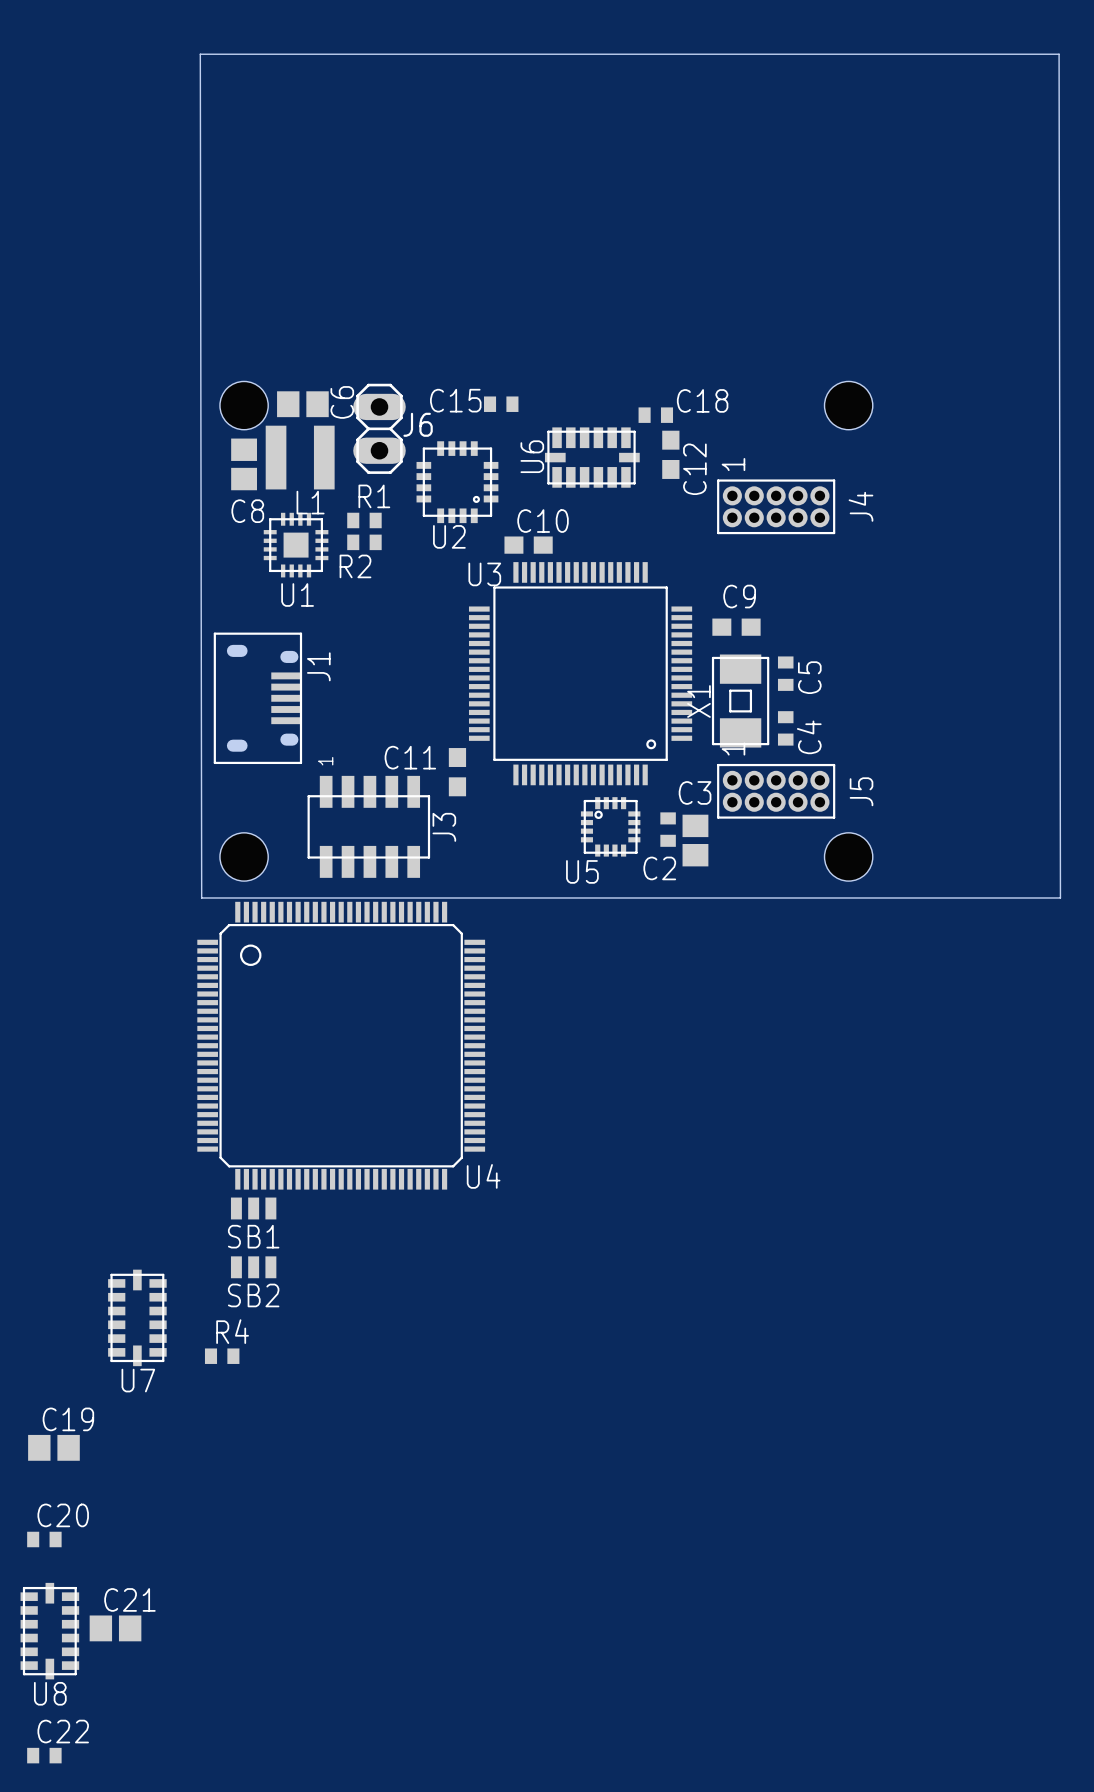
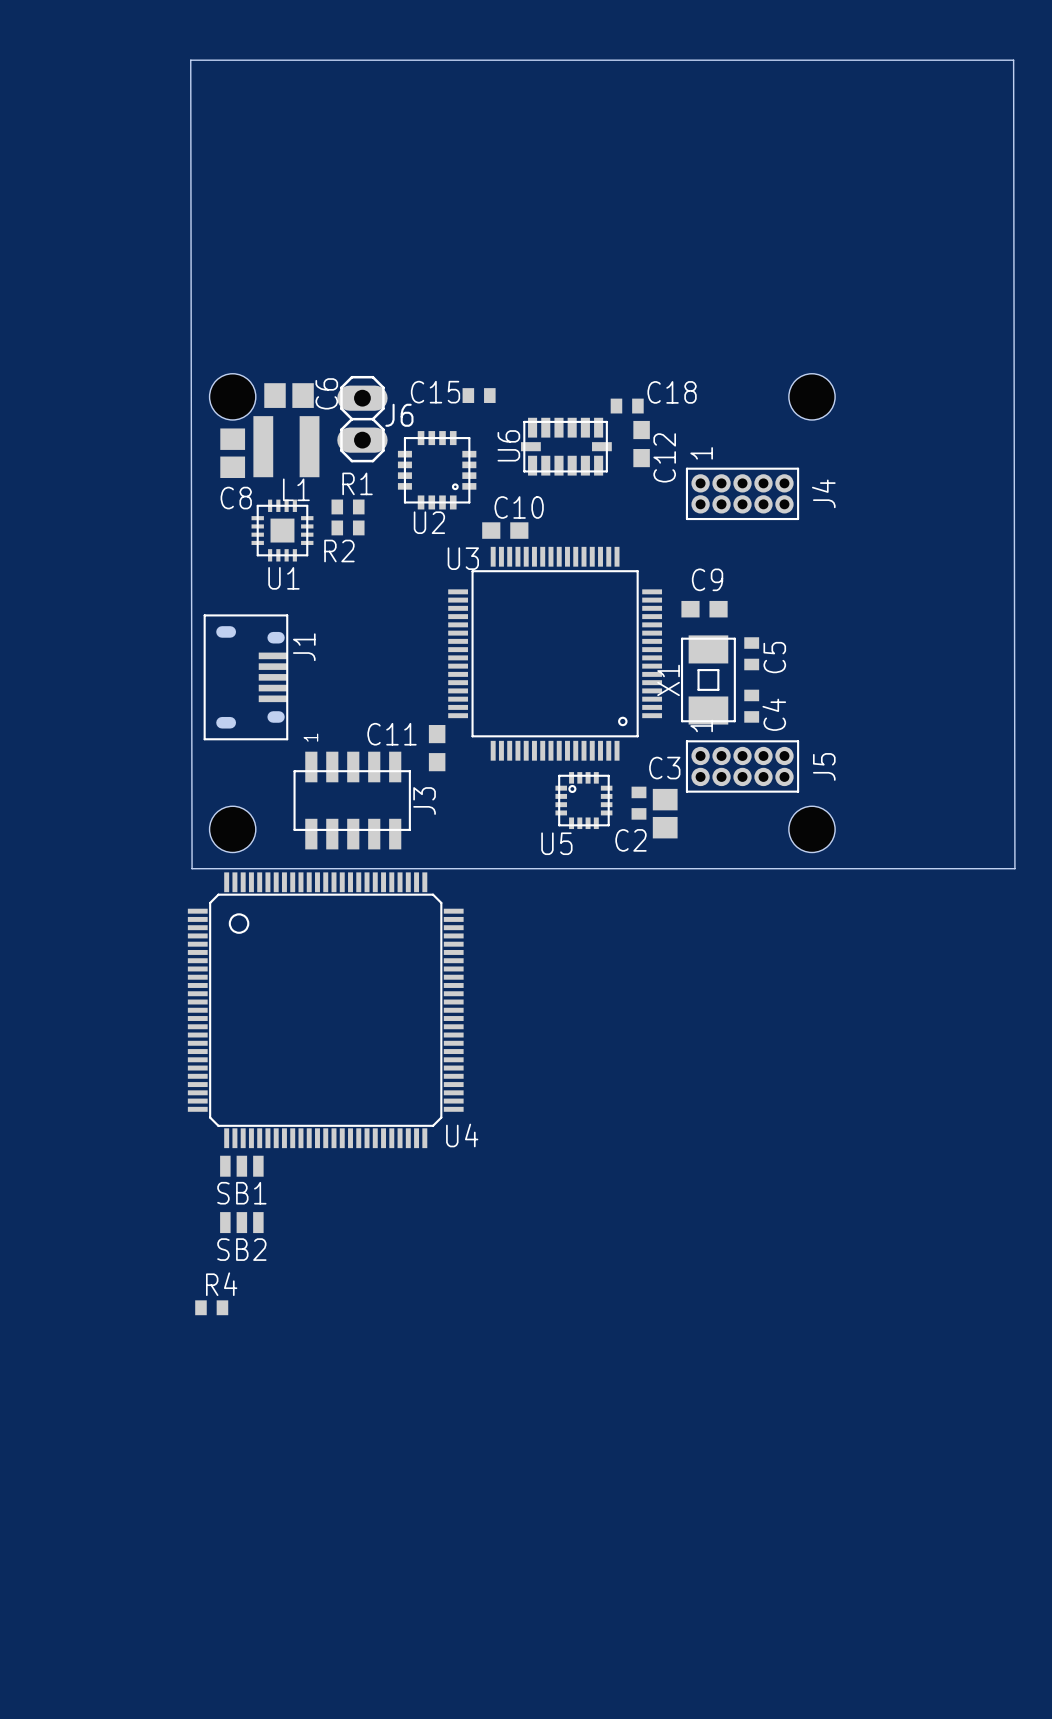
U7: (137, 1317) -> none
C19: (53, 1447) -> none
C20: (44, 1539) -> none
C21: (115, 1628) -> none
U8: (49, 1631) -> none
C22: (44, 1755) -> none

